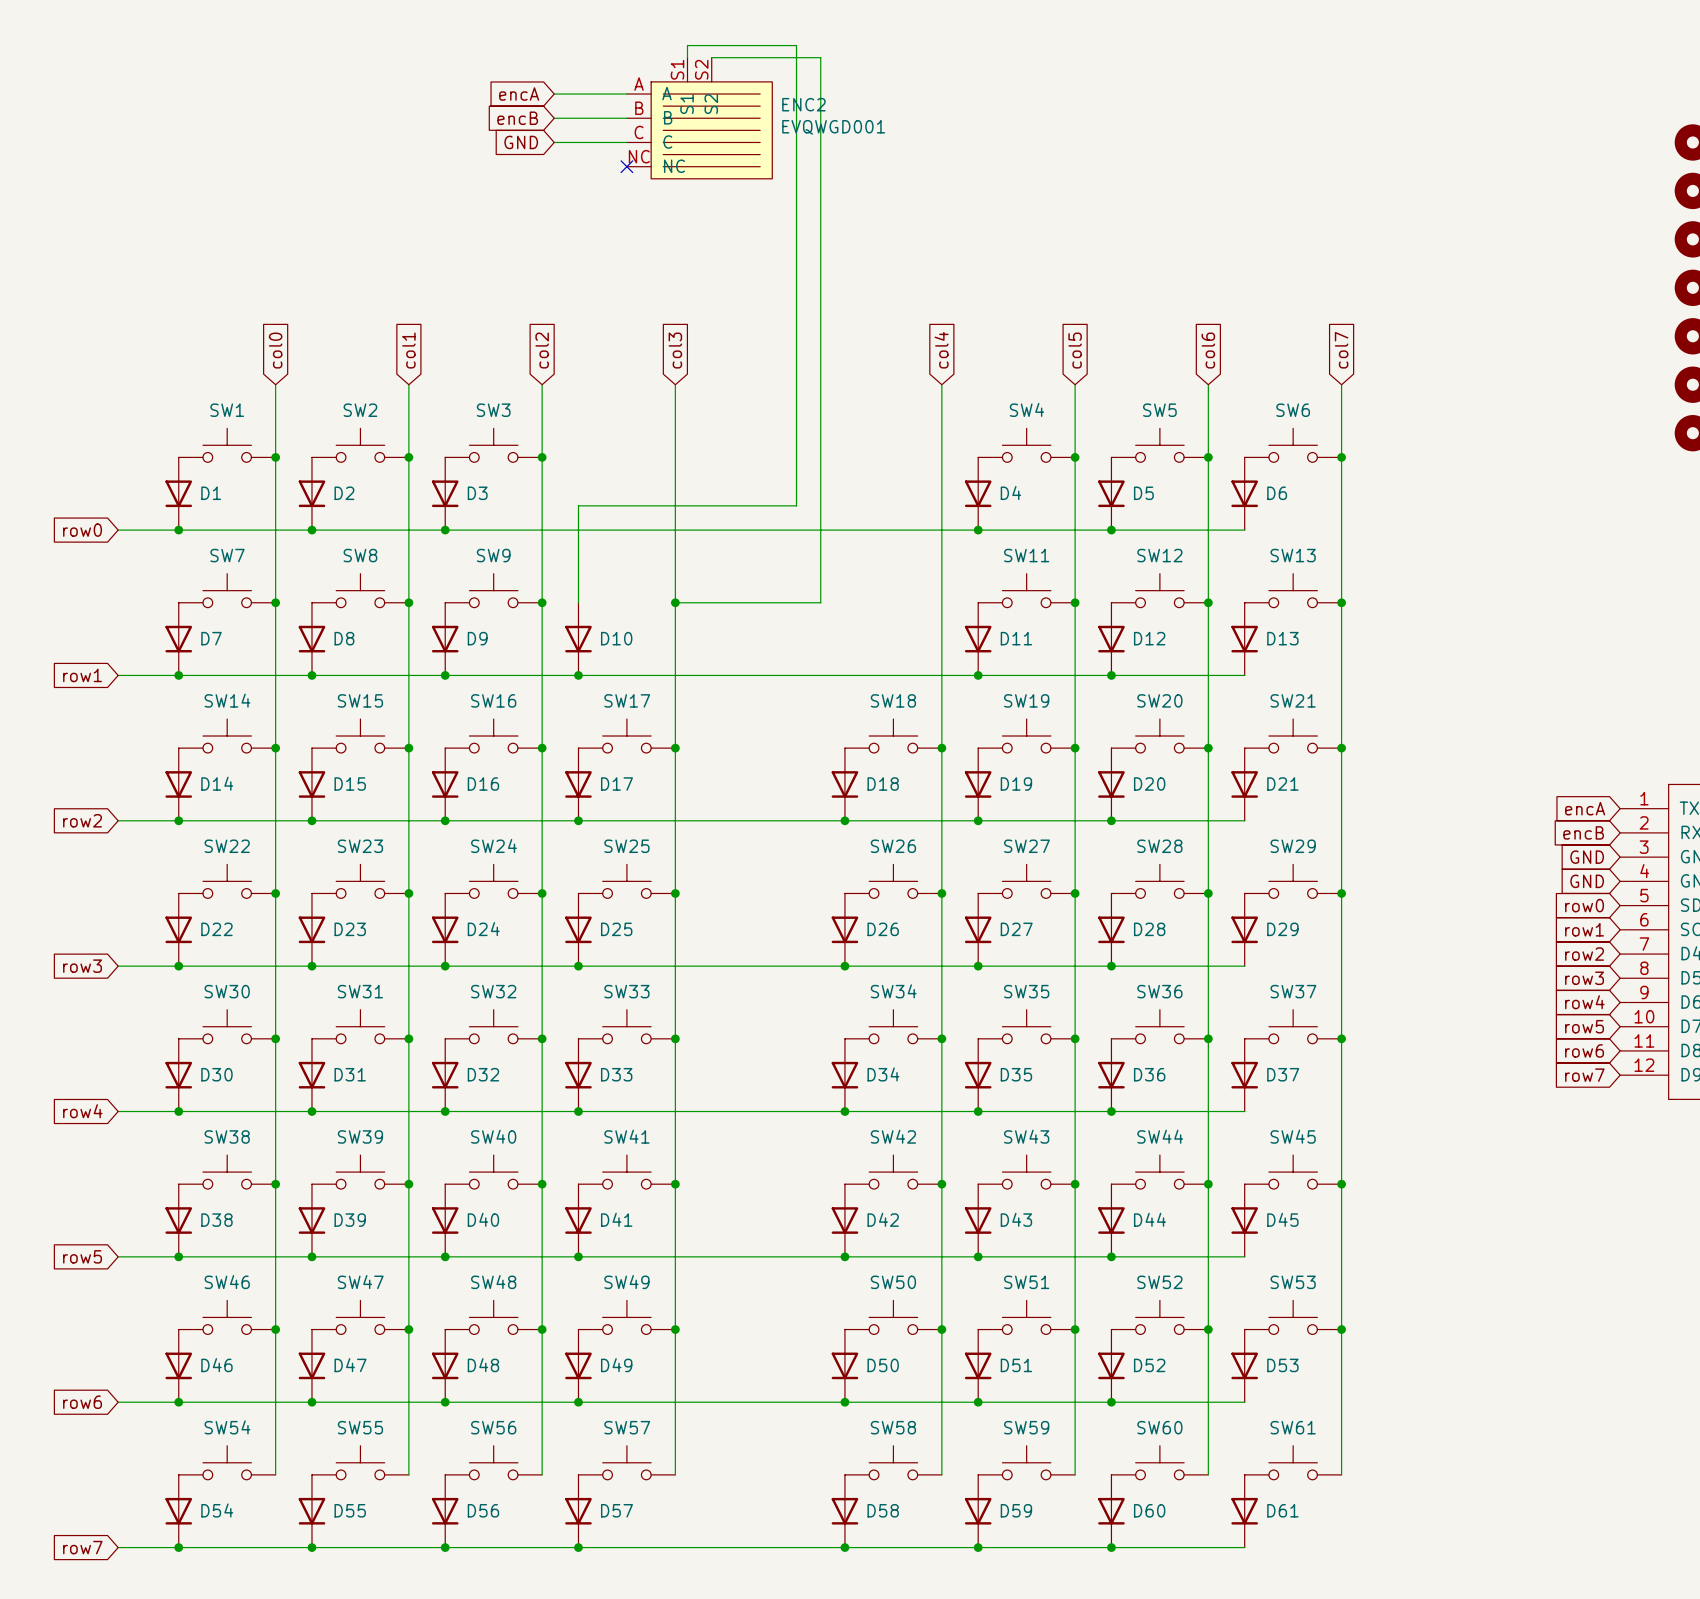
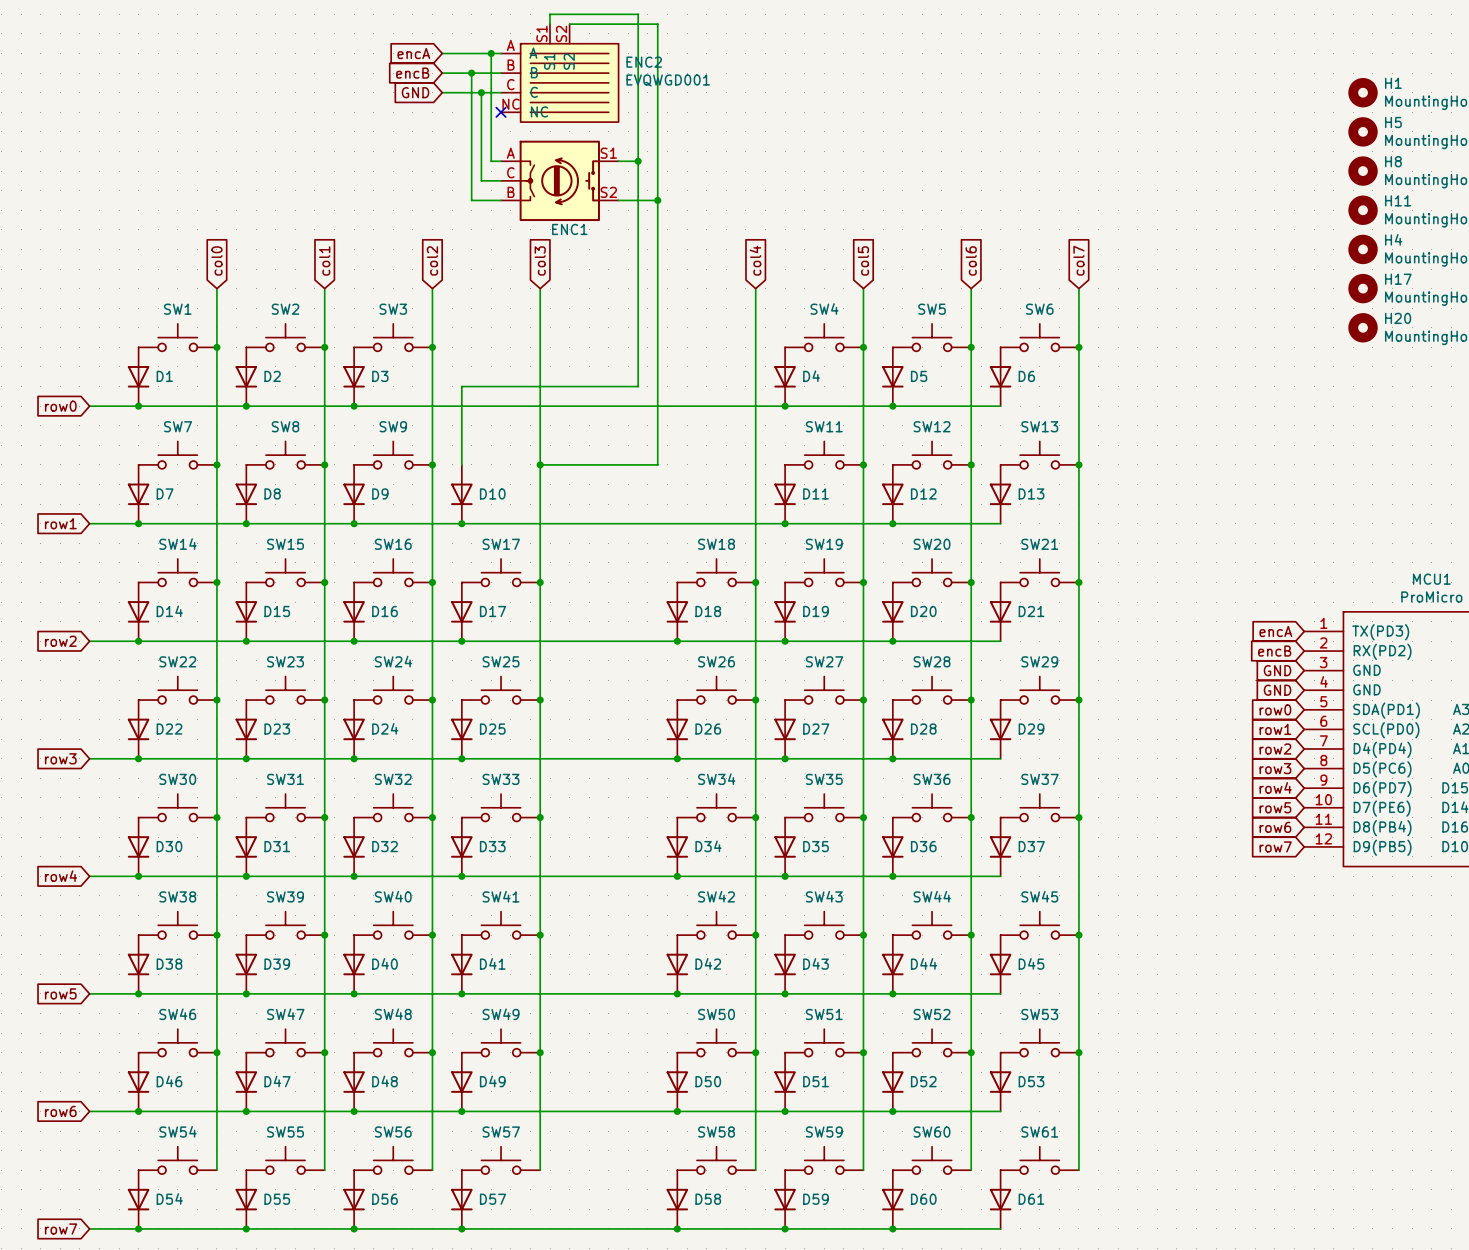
wire: none -> (491, 53) (491, 161) (501, 161)
junction: none -> (491, 53)
wire: none -> (471, 73) (471, 200) (501, 200)
junction: none -> (471, 73)
wire: none -> (481, 92) (481, 180) (501, 180)
junction: none -> (481, 92)
wire: none -> (618, 161) (638, 161)
junction: none -> (638, 161)
ENC1: none -> (559, 180)
wire: none -> (618, 200) (657, 200)
junction: none -> (657, 200)

